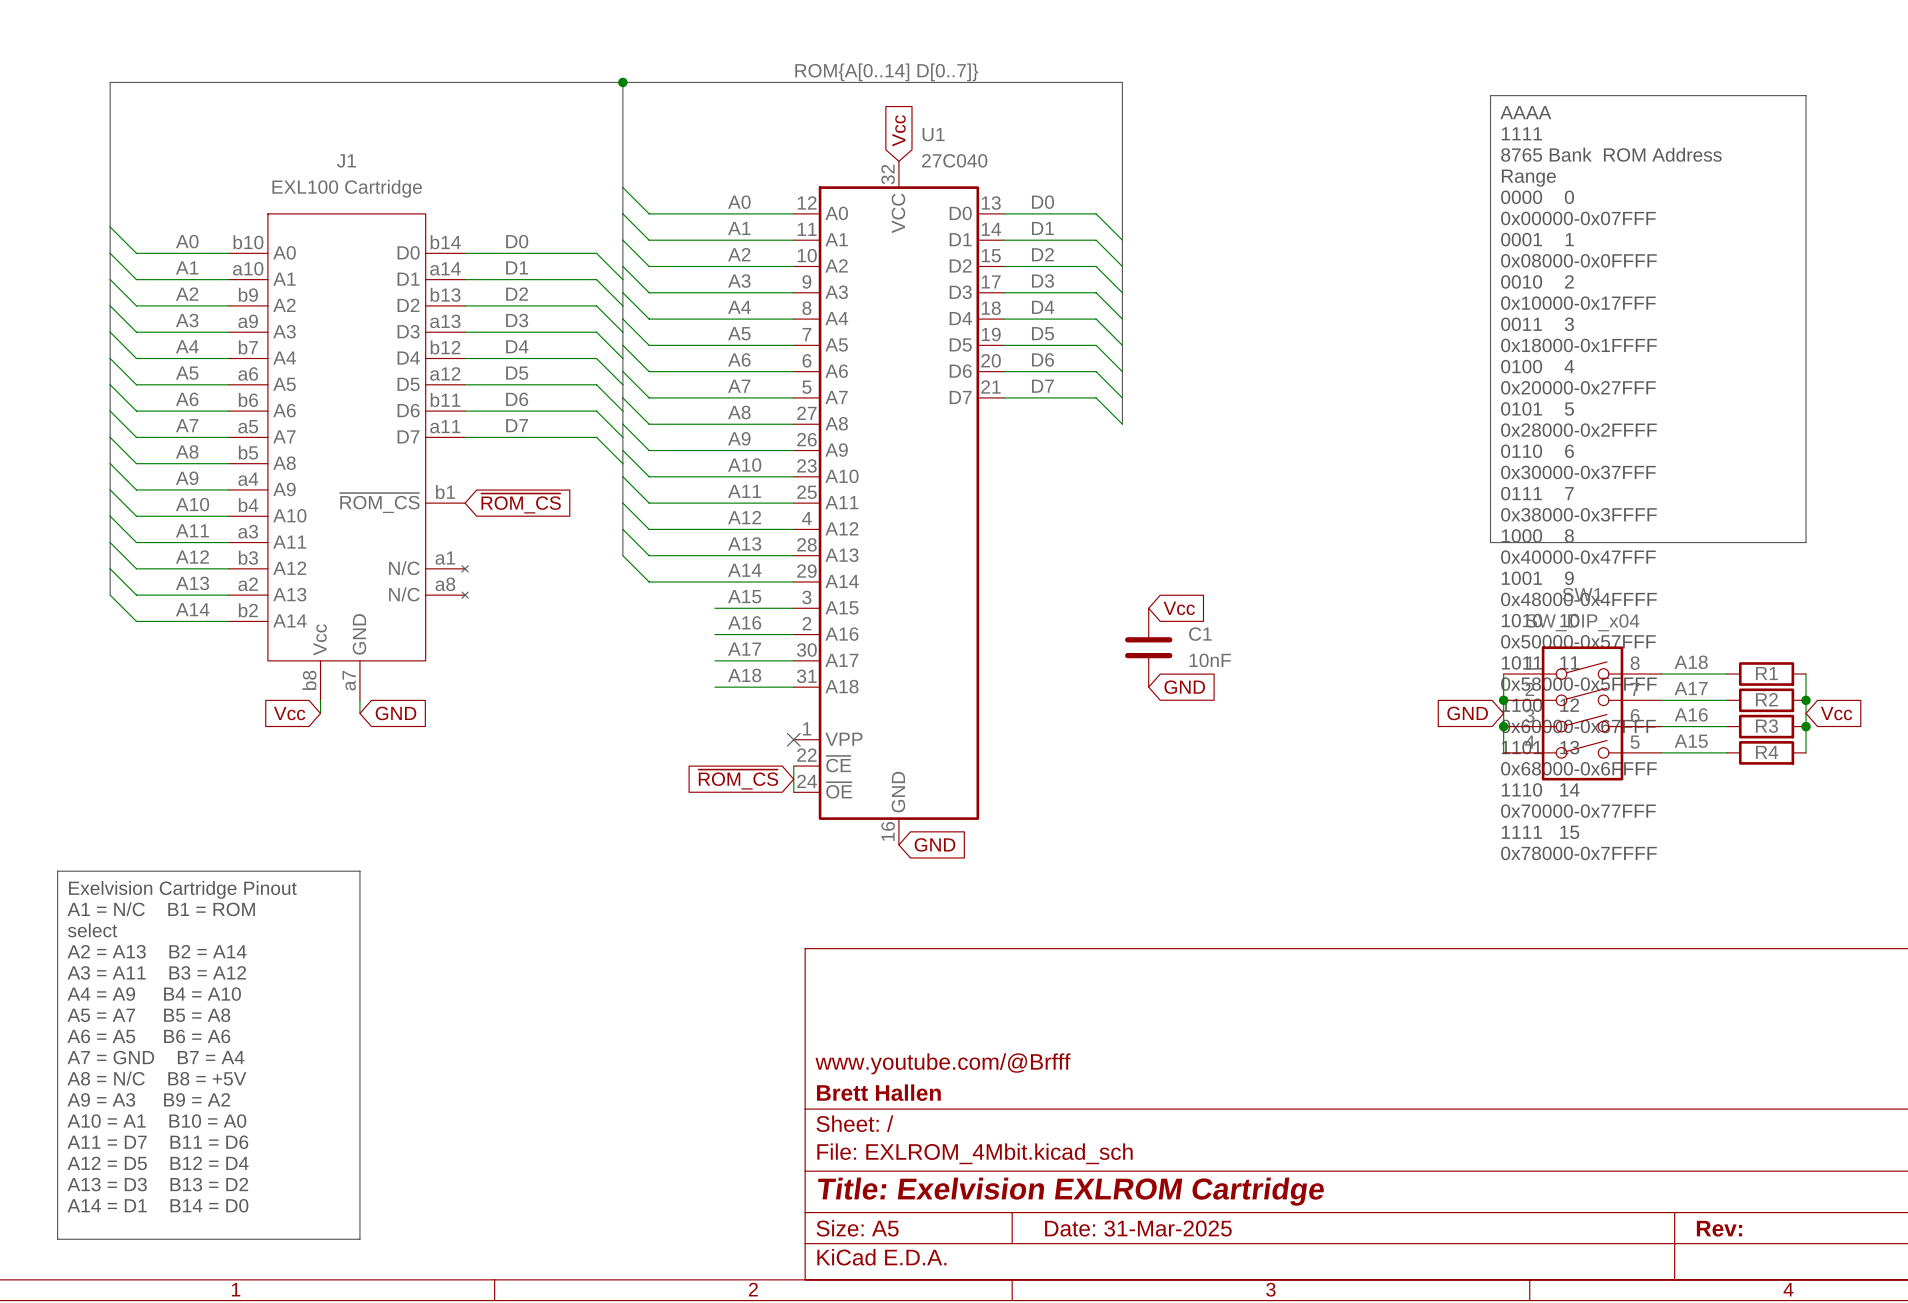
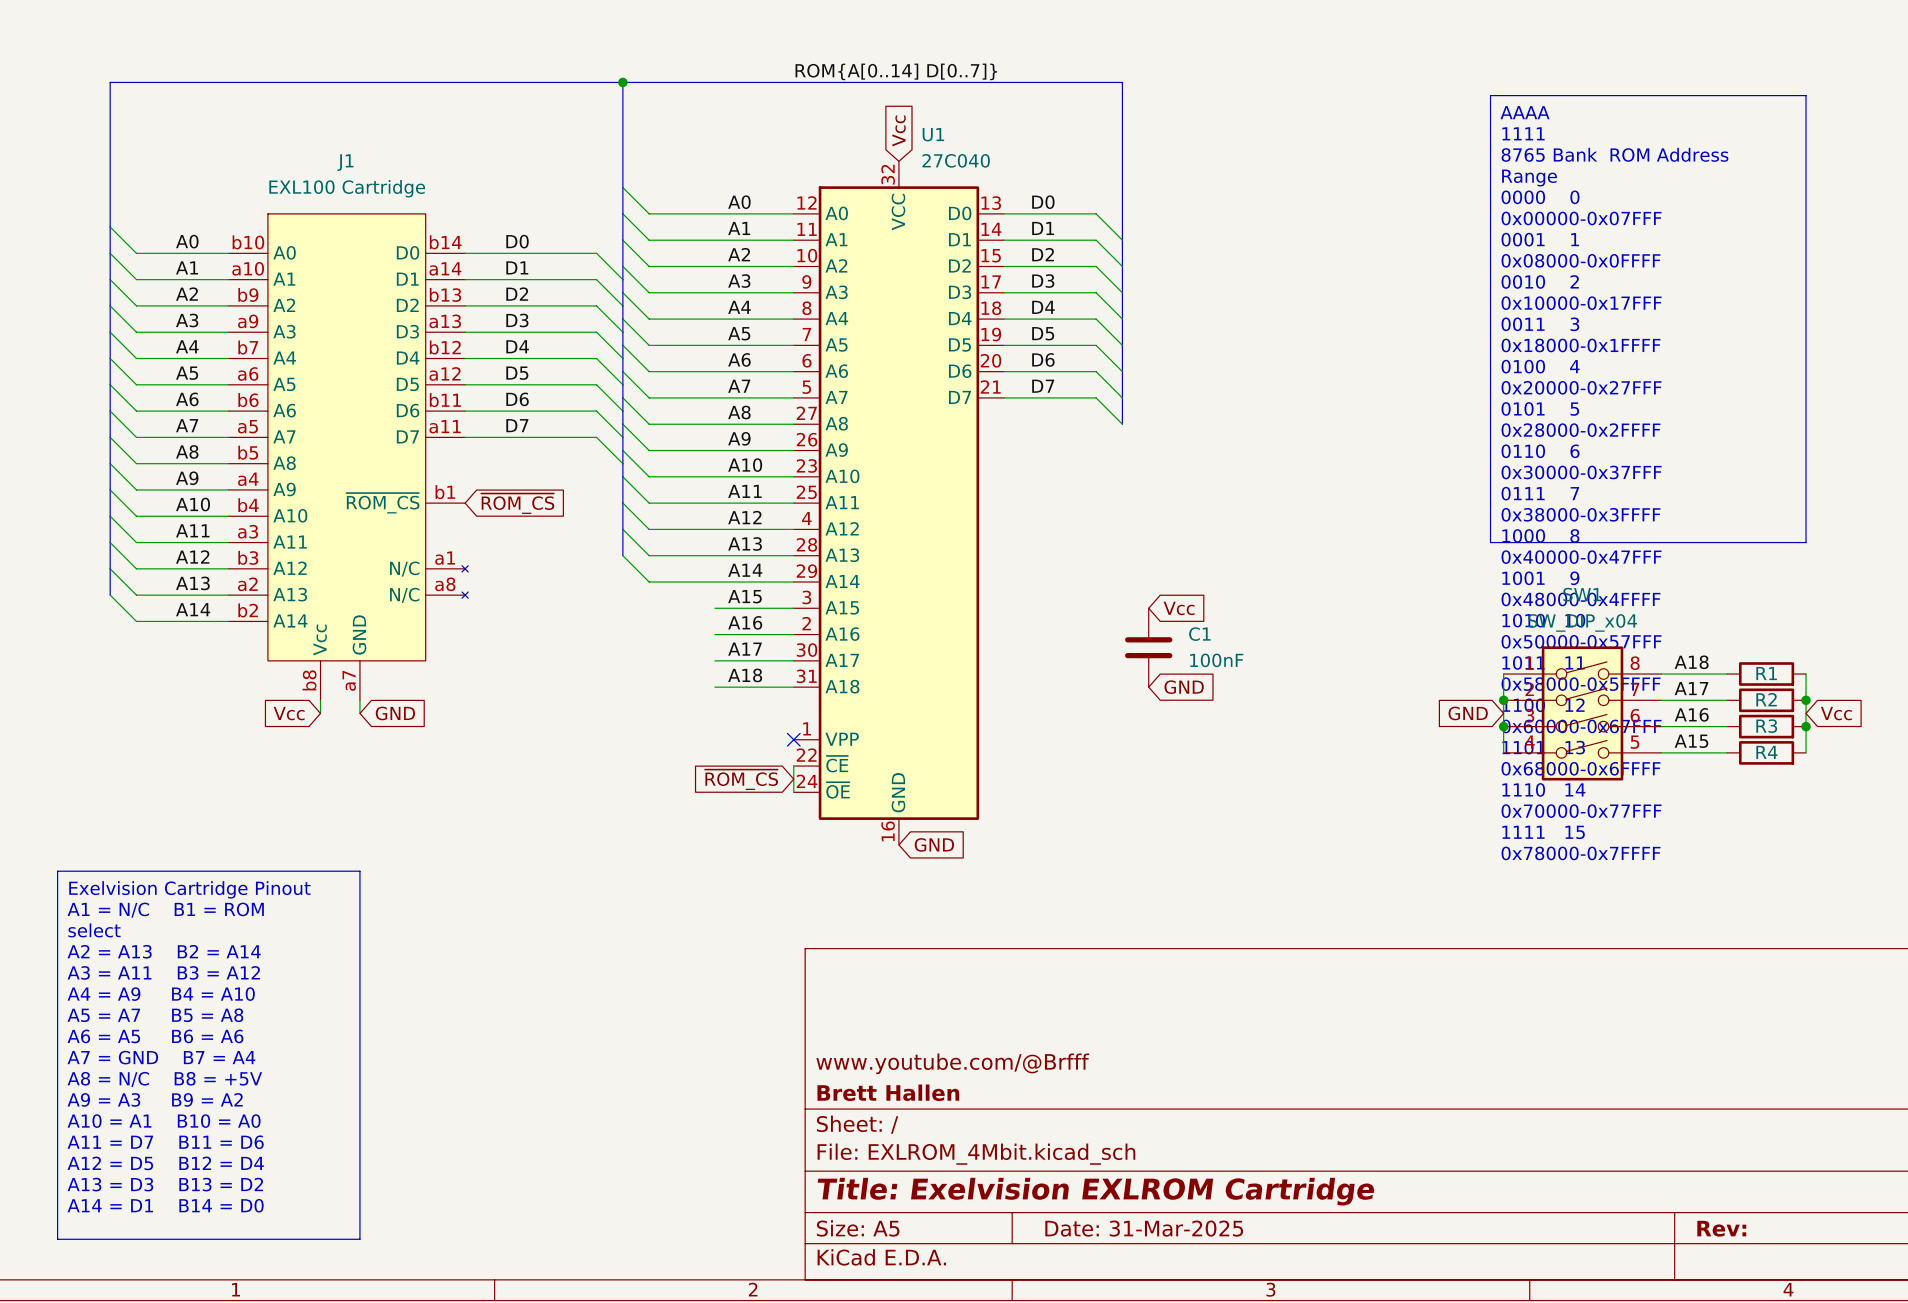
C1 value: 10nF (1210, 660) -> 100nF (1216, 660)

